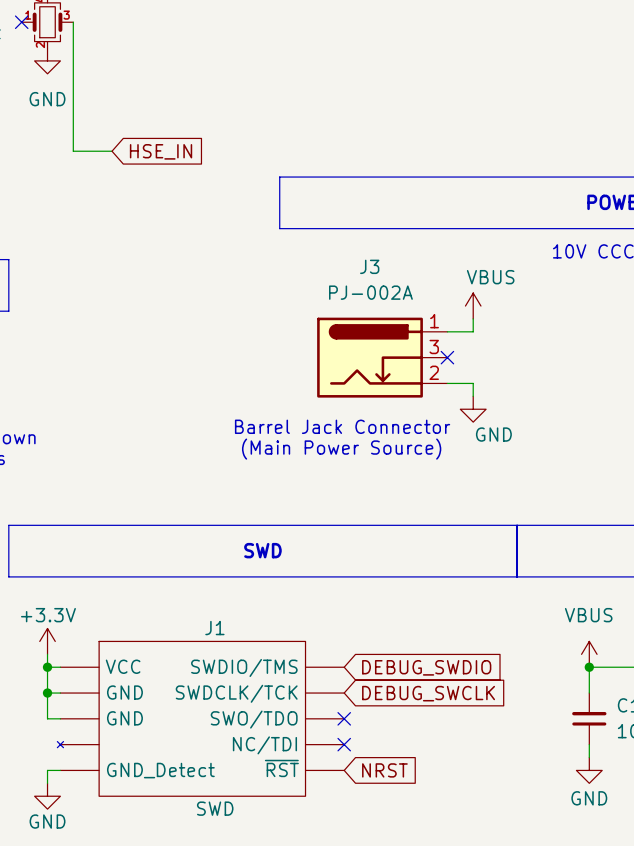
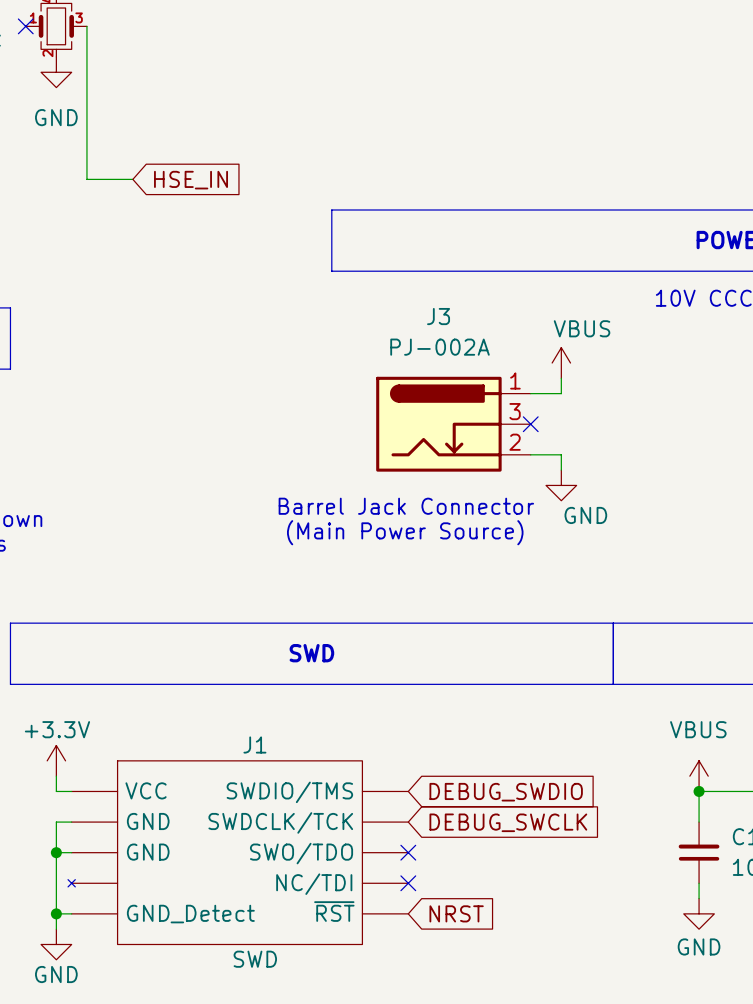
wire: (47, 667) (47, 693) -> none
junction: (47, 667) -> none
junction: (47, 693) -> none
wire: none -> (56, 852) (56, 913)
junction: none -> (56, 852)
junction: none -> (56, 913)

